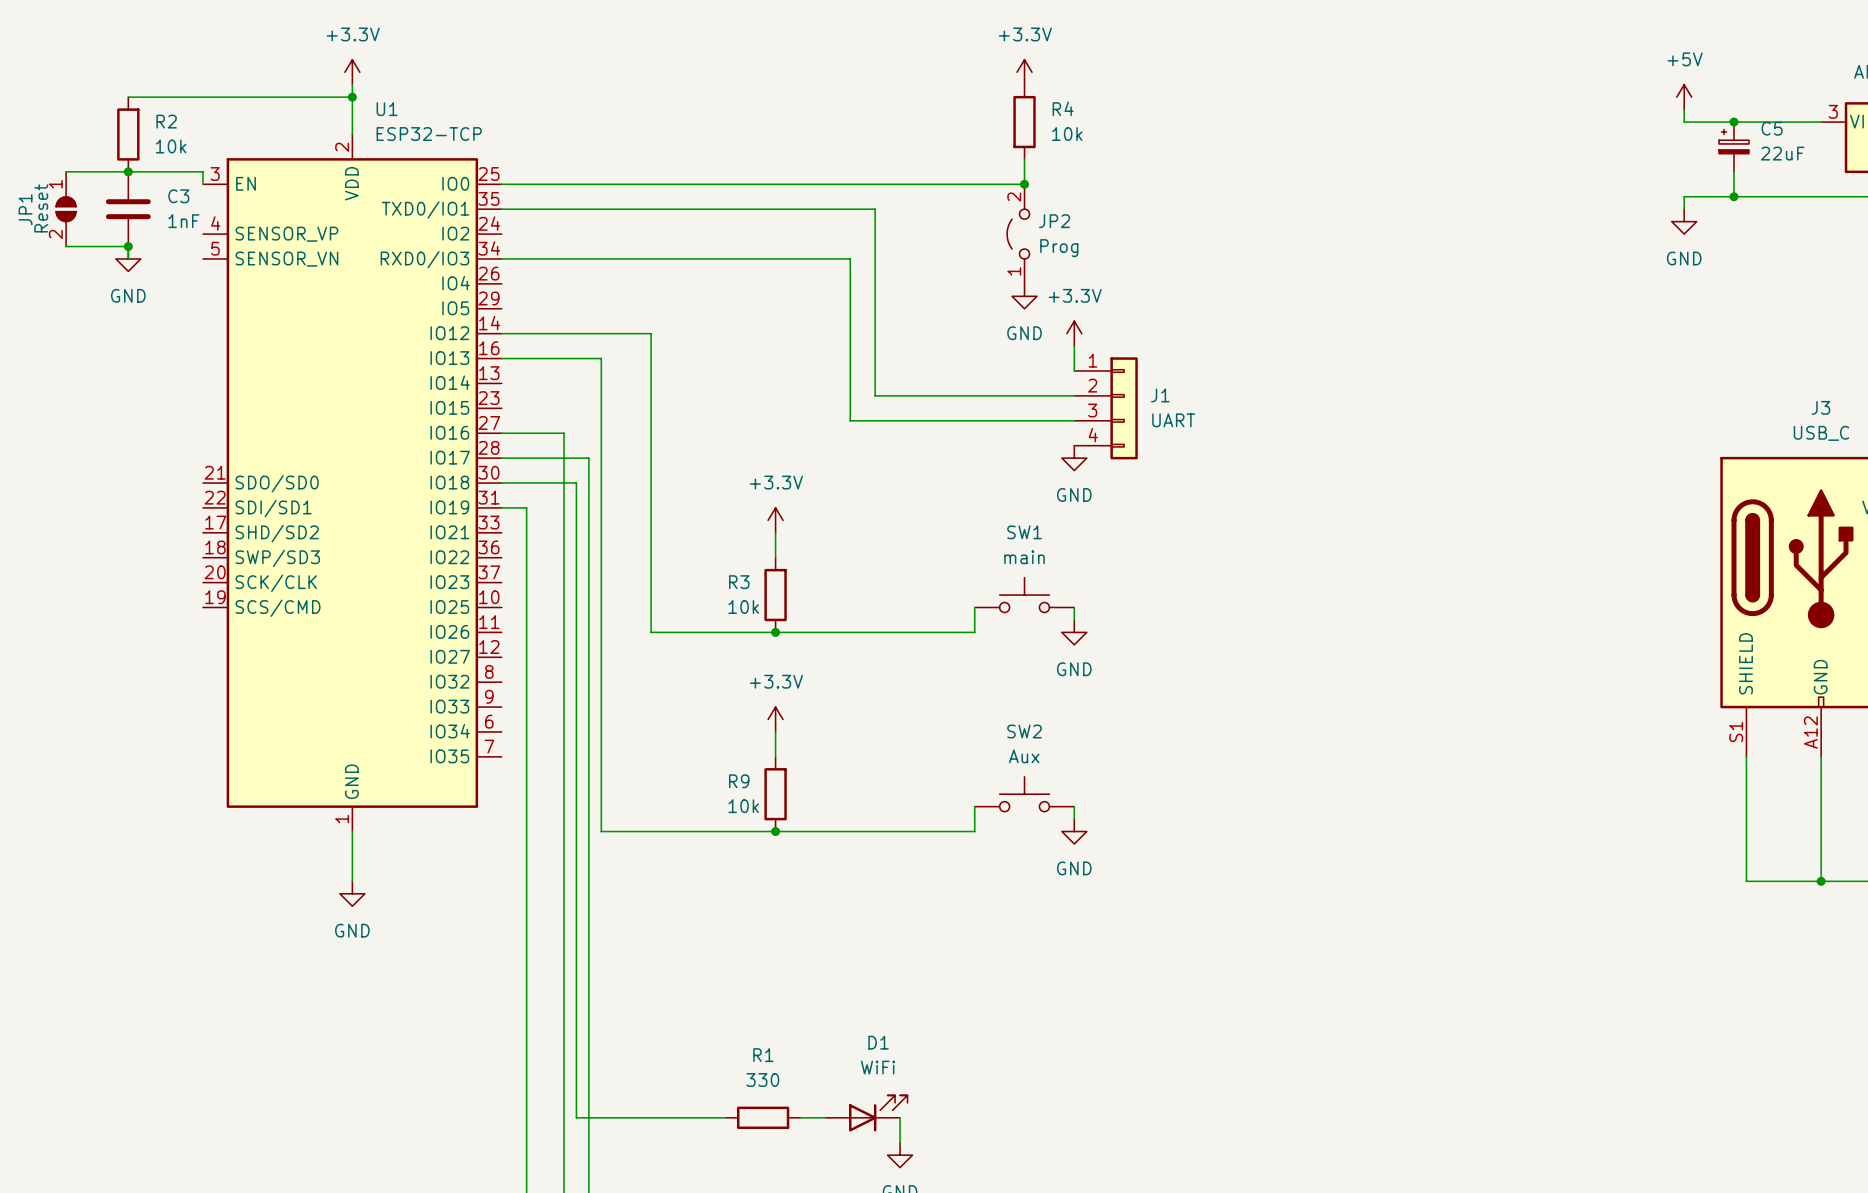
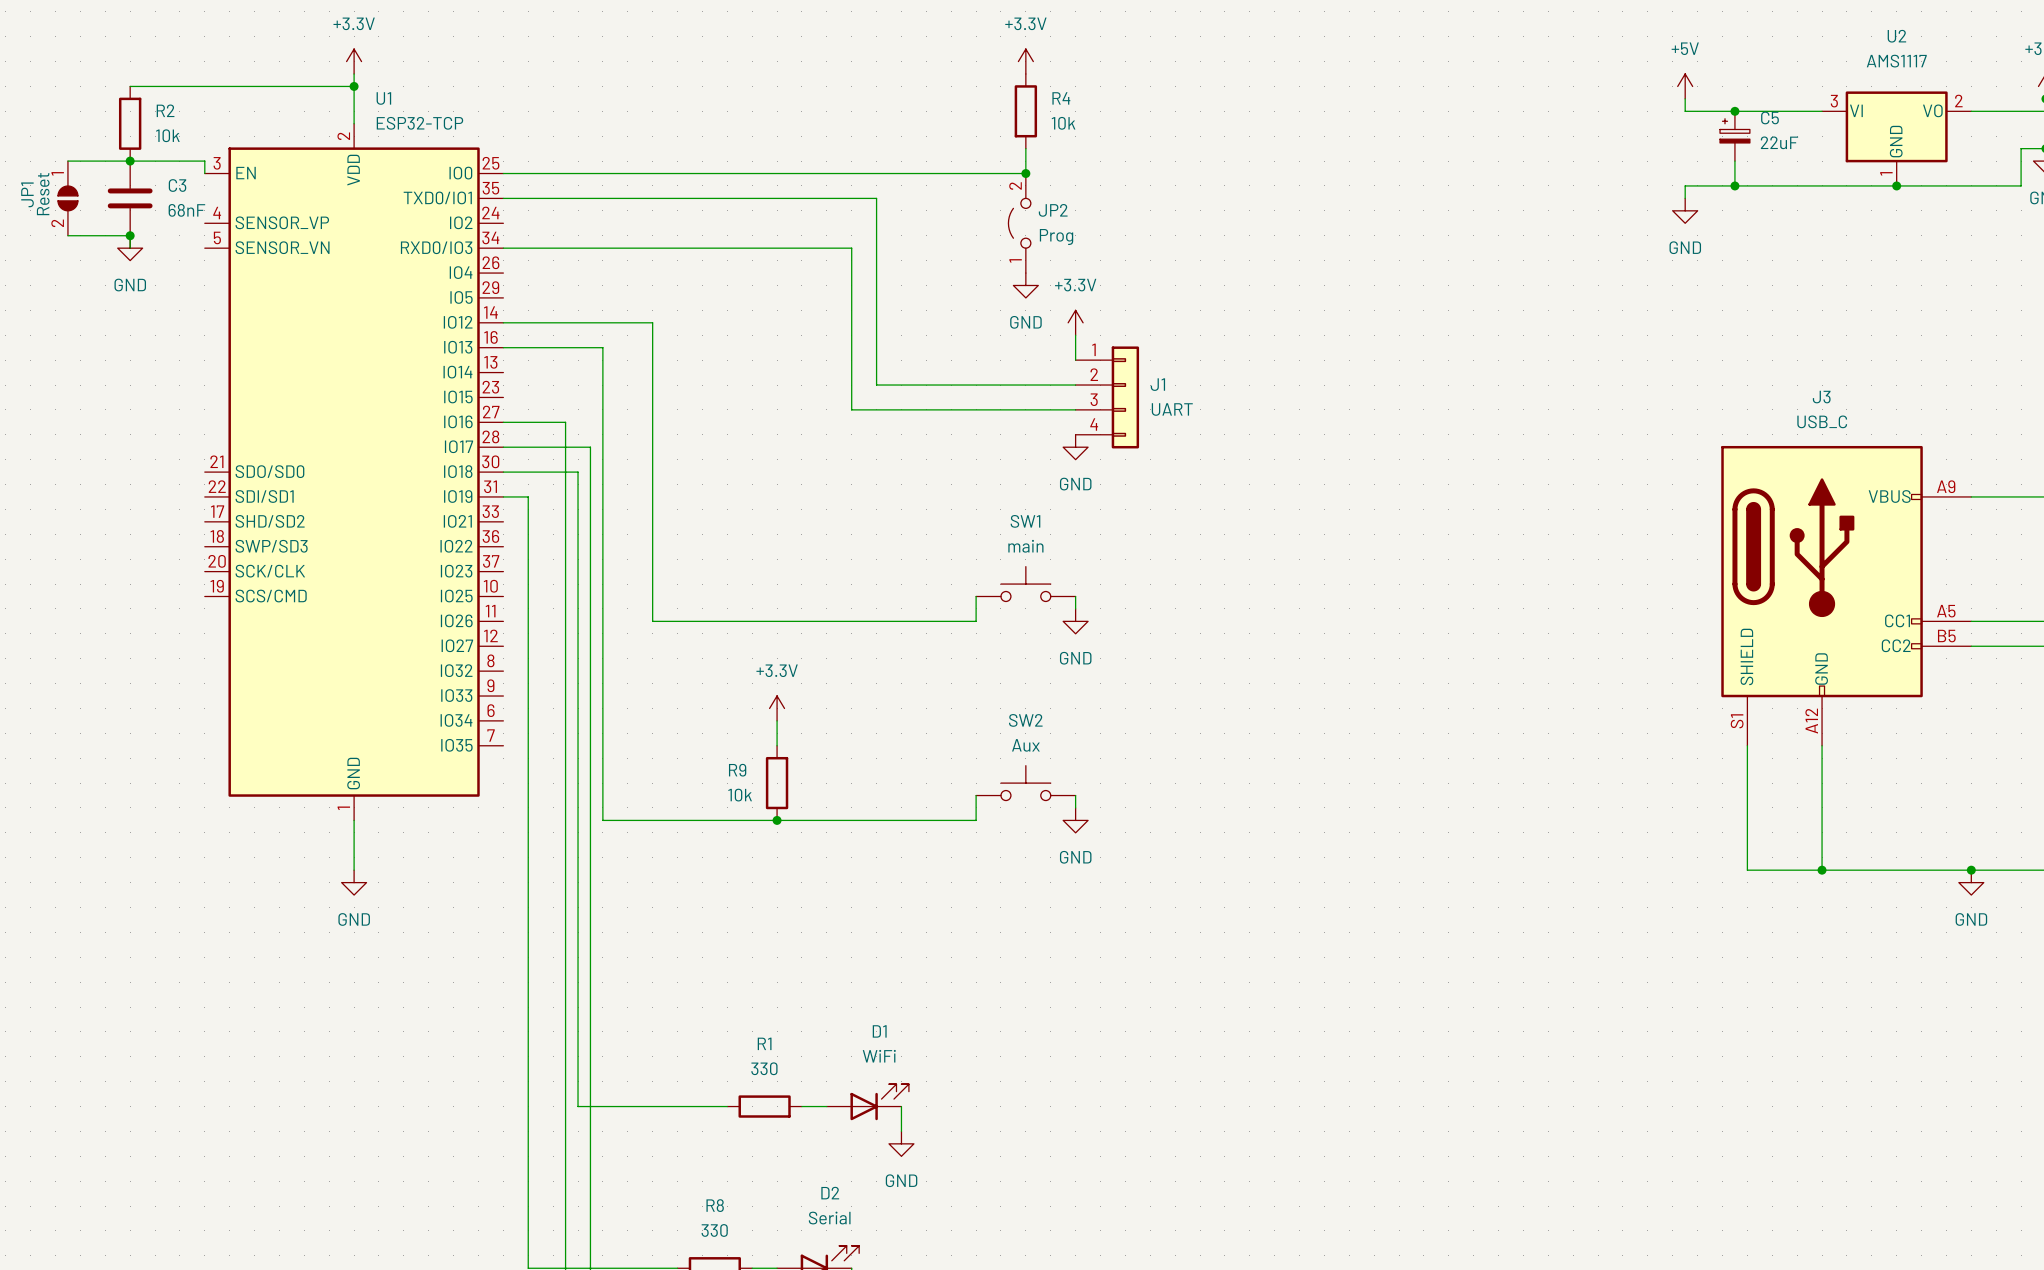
C3 value: 1nF (183, 221) -> 68nF (186, 210)
power symbol: +3.3V (775, 520) -> none
wire: (775, 532) (775, 557) -> none
R3: 10k (775, 595) -> none
junction: (775, 632) -> none

